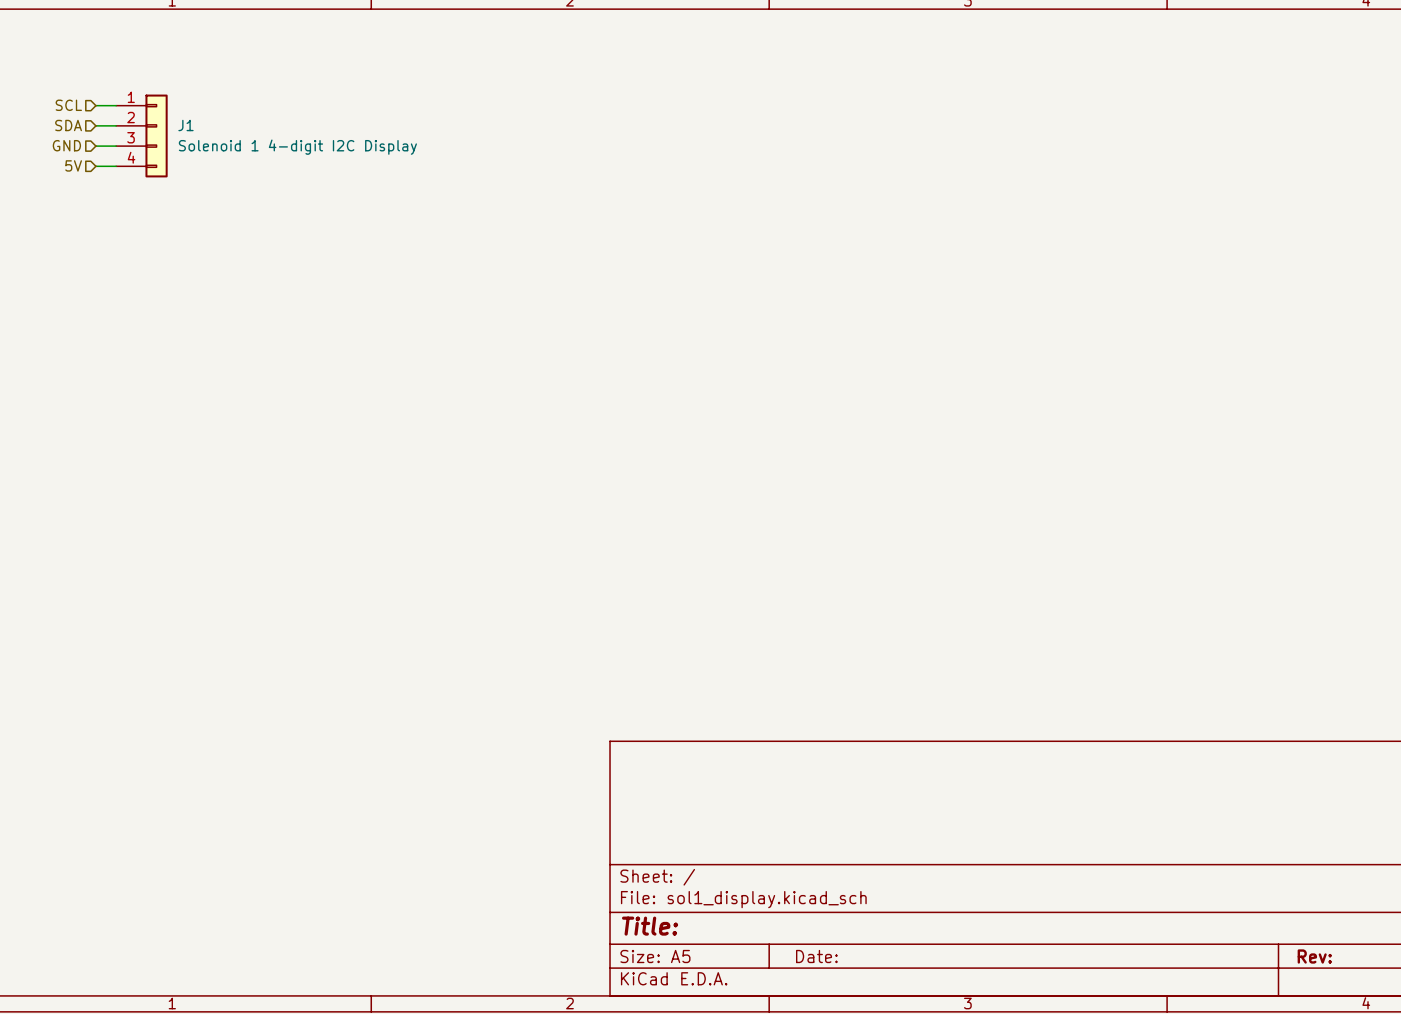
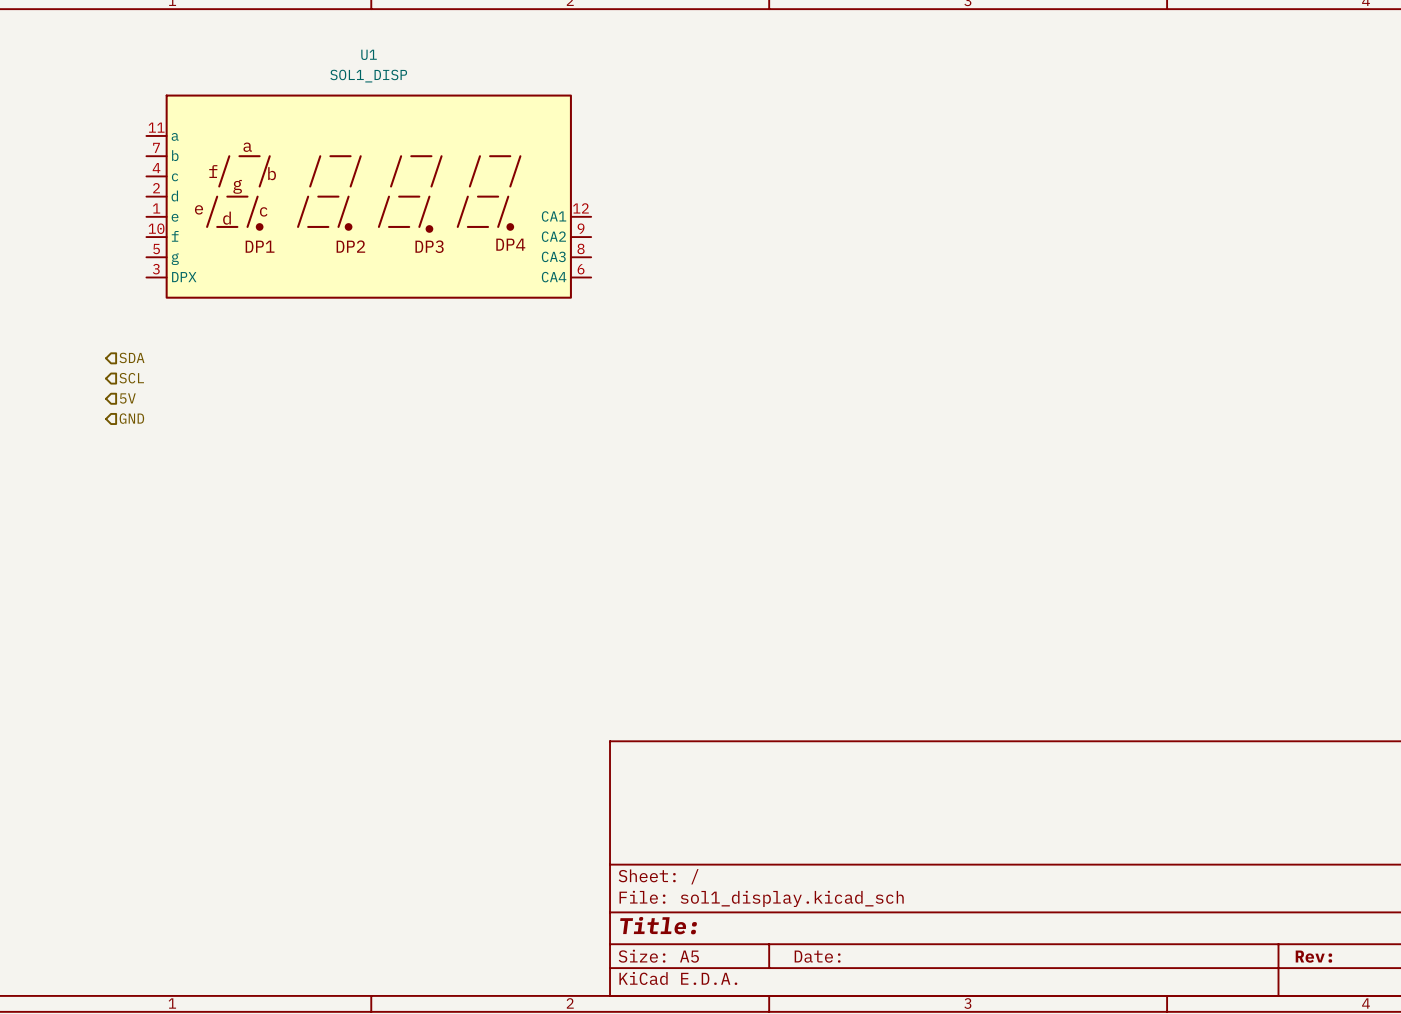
hierarchical label: SCL (68, 105) -> none
wire: (95, 105) (116, 105) -> none
hierarchical label: SDA (68, 125) -> none
wire: (95, 125) (116, 125) -> none
J1: Solenoid 1 4-digit I2C Display (141, 135) -> none
hierarchical label: GND (66, 145) -> none
wire: (95, 146) (116, 146) -> none
hierarchical label: 5V (73, 165) -> none
wire: (95, 166) (116, 166) -> none
U1: none -> SOL1_DISP (368, 196)
hierarchical label: none -> SDA (132, 357)
hierarchical label: none -> SCL (131, 378)
hierarchical label: none -> 5V (127, 398)
hierarchical label: none -> GND (131, 418)

